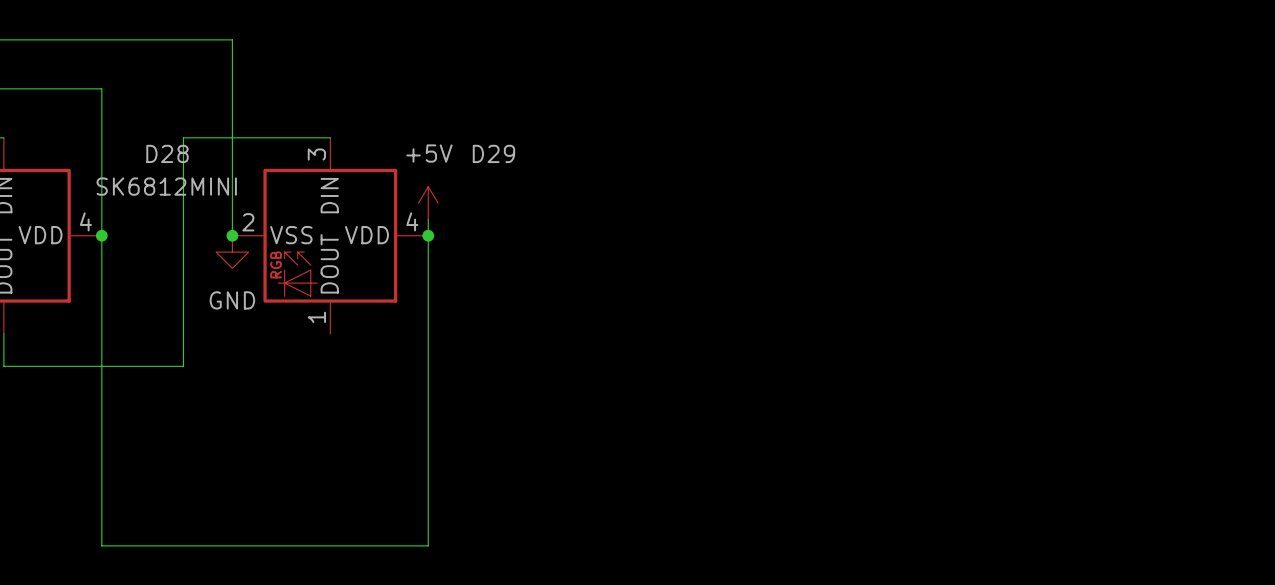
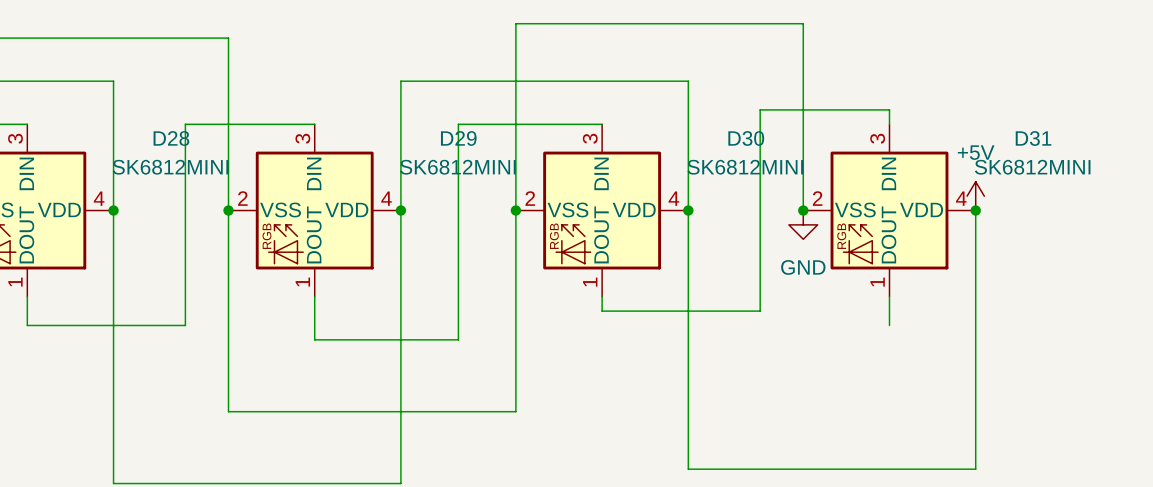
wire: none -> (602, 124) (458, 124) (458, 339) (314, 339) (314, 296)
wire: none -> (889, 124) (889, 109) (760, 109) (760, 311) (602, 311) (602, 296)
D29 value: none -> SK6812MINI (457, 167)
power symbol: +5V (428, 203) -> none
wire: none -> (400, 196) (400, 81) (688, 81) (688, 469) (975, 469) (975, 210)
power symbol: none -> +5V (975, 196)
wire: none -> (228, 210) (228, 411) (515, 411) (515, 23) (803, 23) (803, 210)
junction: none -> (515, 210)
D30: none -> SK6812MINI (602, 210)
junction: none -> (688, 210)
junction: none -> (803, 210)
D31: none -> SK6812MINI (889, 210)
junction: none -> (975, 210)
power symbol: GND (232, 252) -> none
power symbol: none -> GND (803, 224)
wire: none -> (889, 296) (889, 325)

